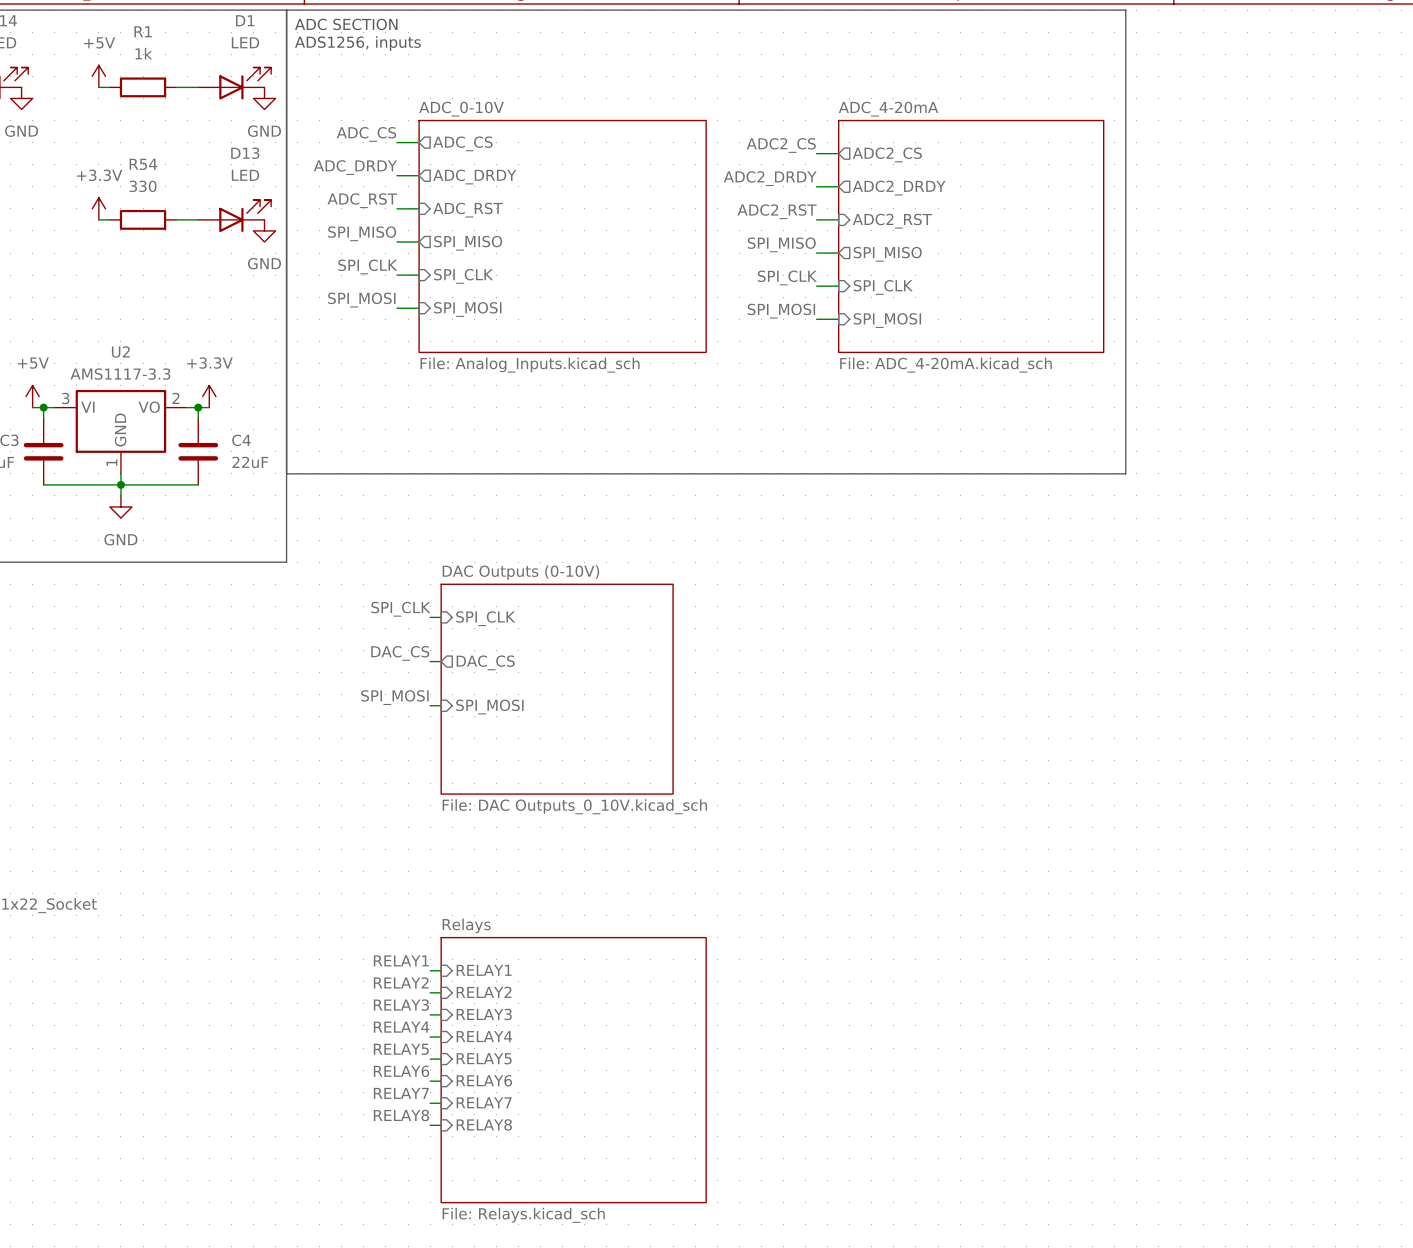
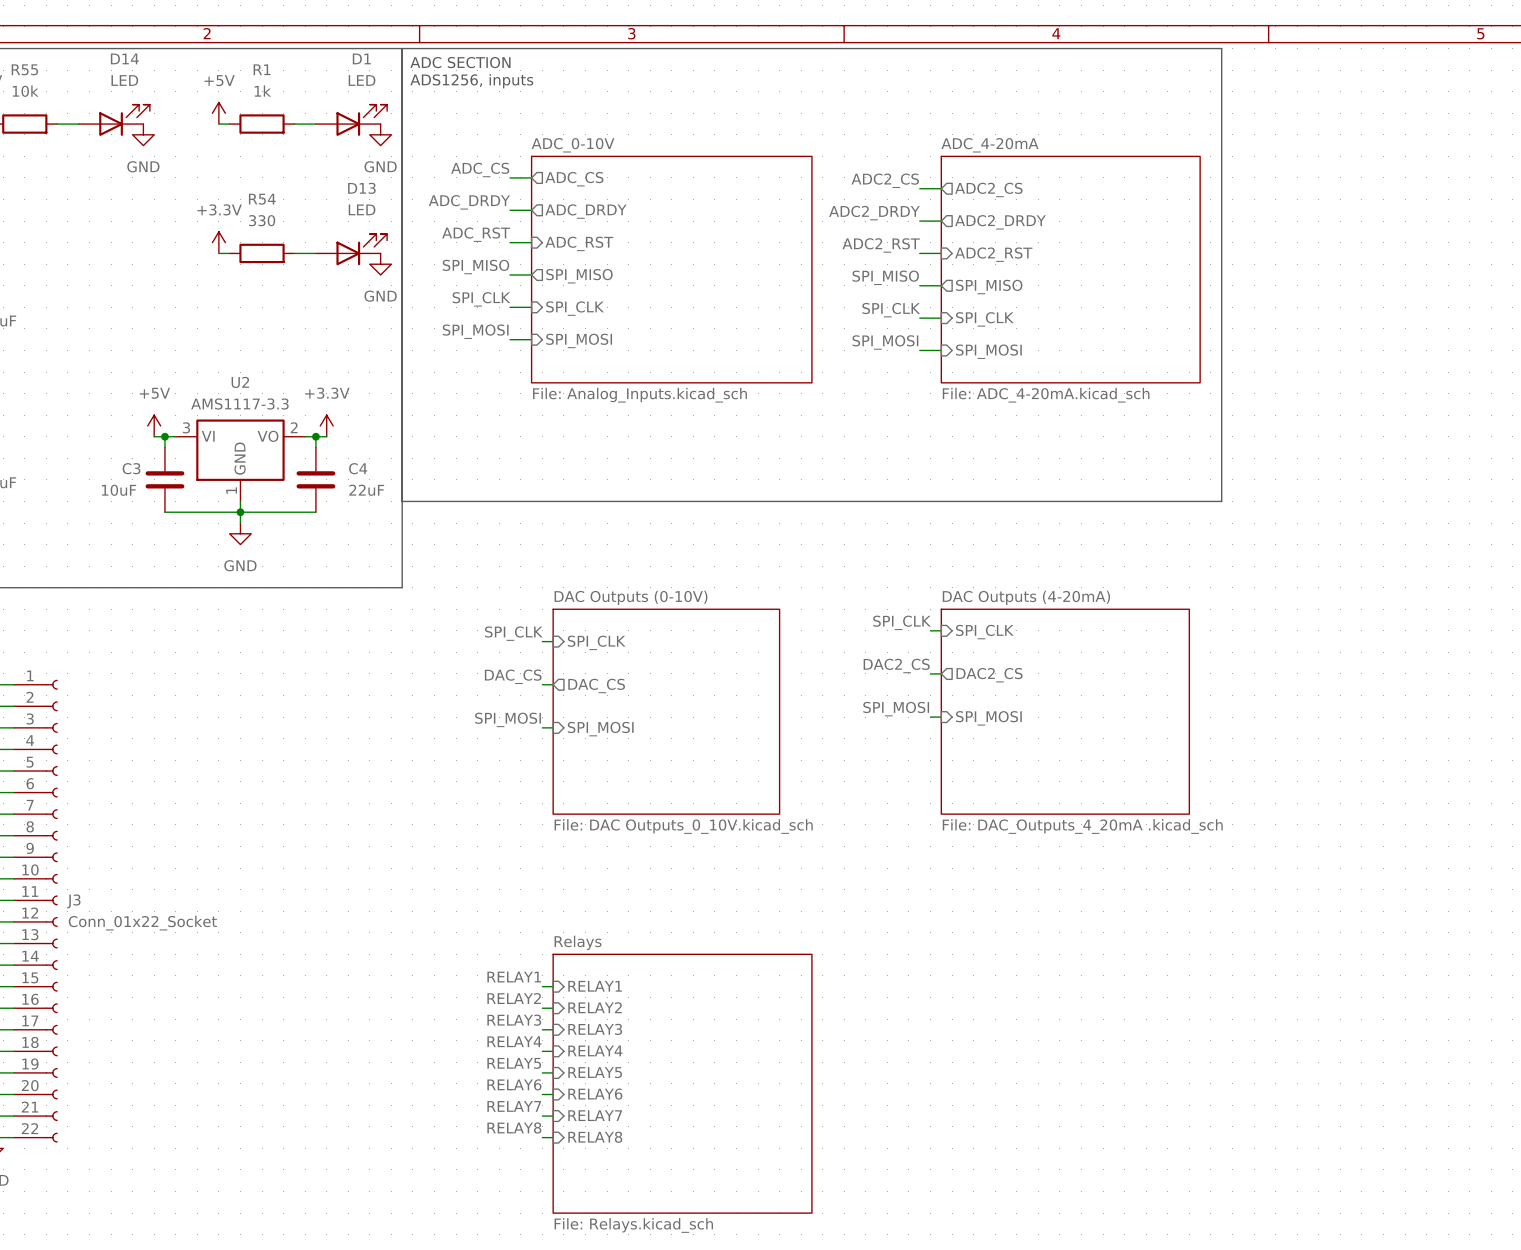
label: none -> SPI_CLK (902, 622)
wire: none -> (930, 630) (941, 630)
sheet pin: none -> SPI_CLK (984, 632)
label: none -> DAC2_CS (896, 665)
wire: none -> (930, 673) (941, 673)
sheet pin: none -> DAC2_CS (989, 675)
label: none -> SPI_MOSI (896, 709)
sheet DAC Outputs (4-20mA): none -> File: DAC_Outputs_4_20mA .kicad_sch (1065, 711)
wire: none -> (930, 717) (941, 717)
sheet pin: none -> SPI_MOSI (988, 718)

